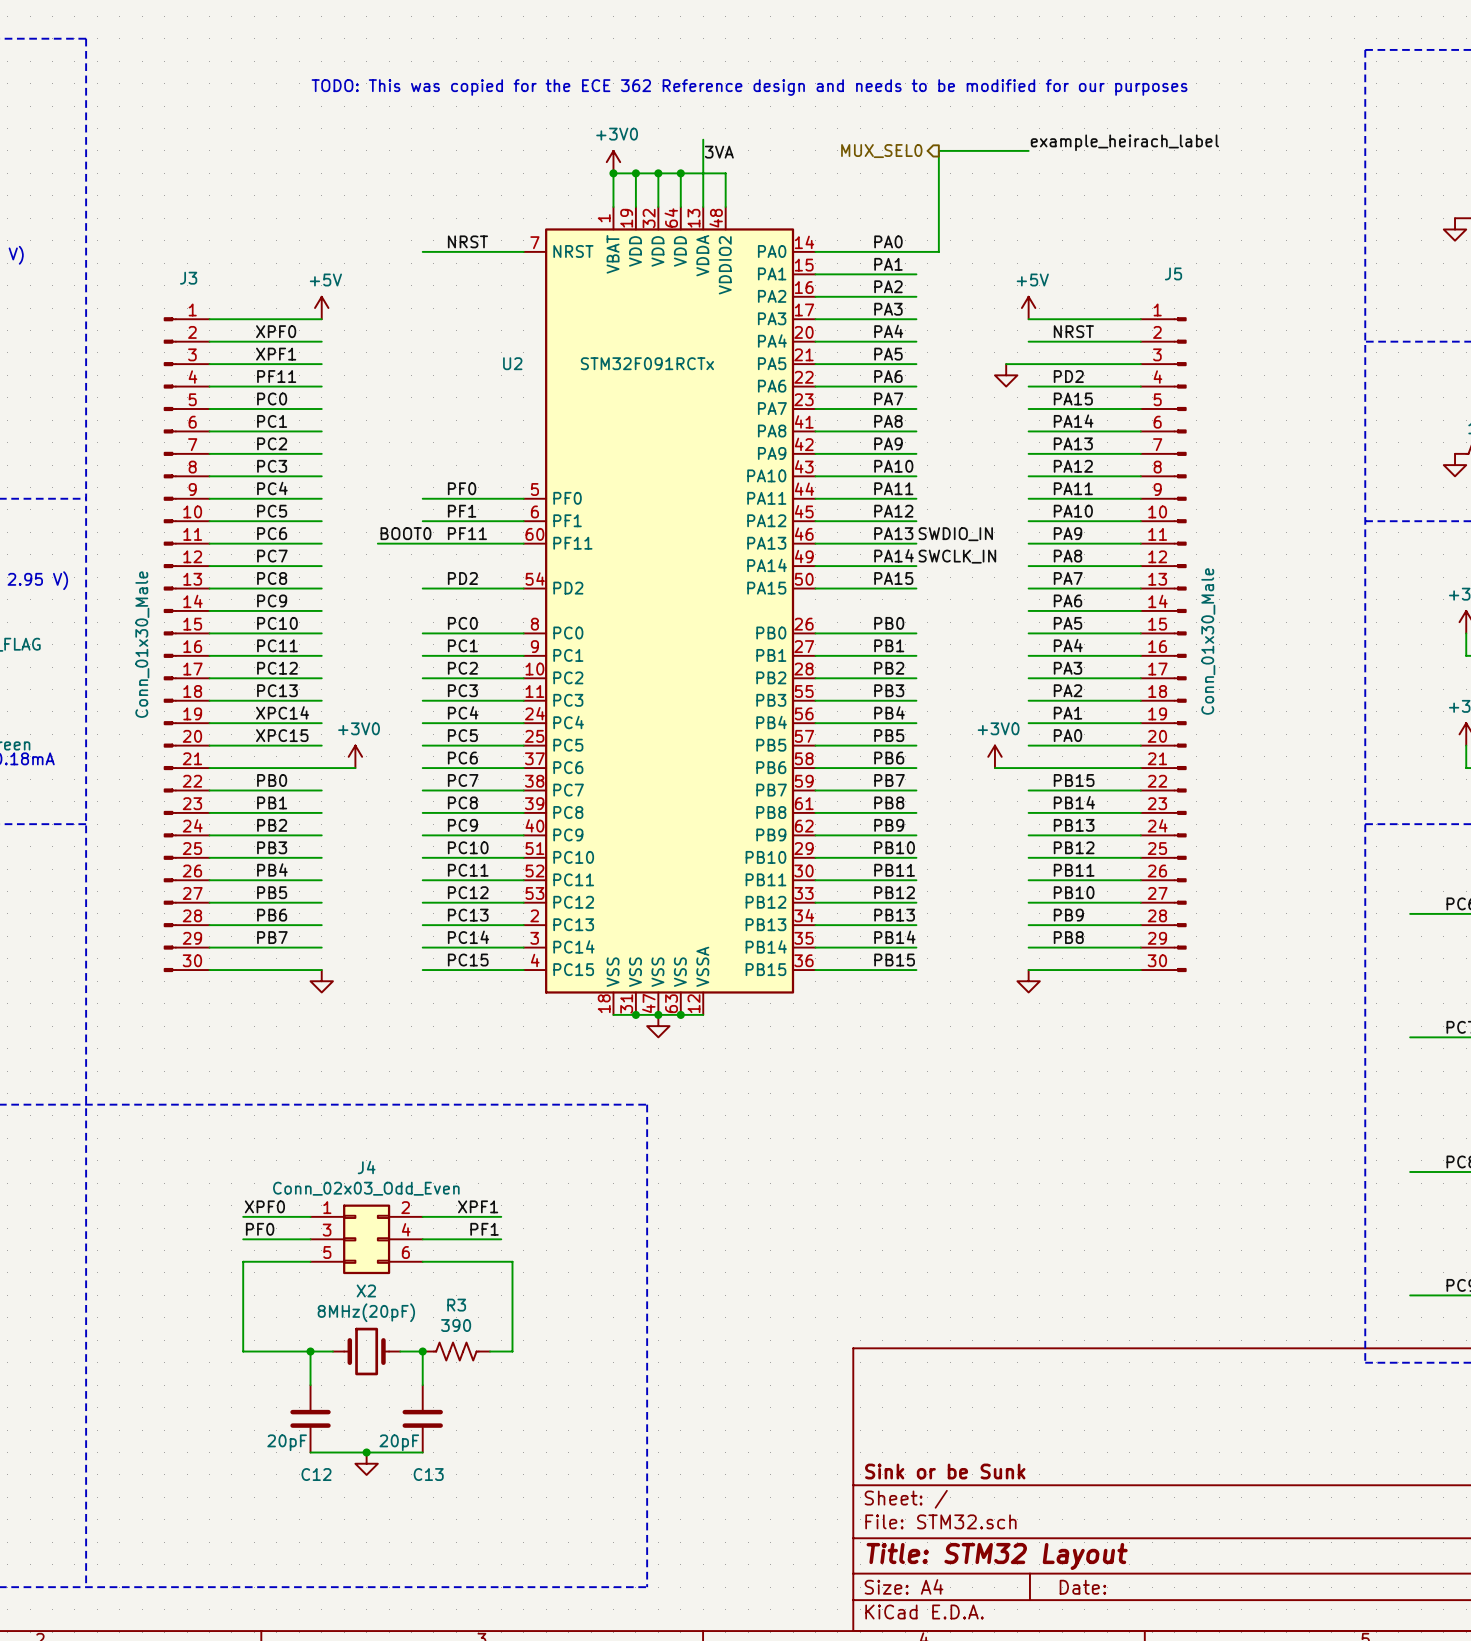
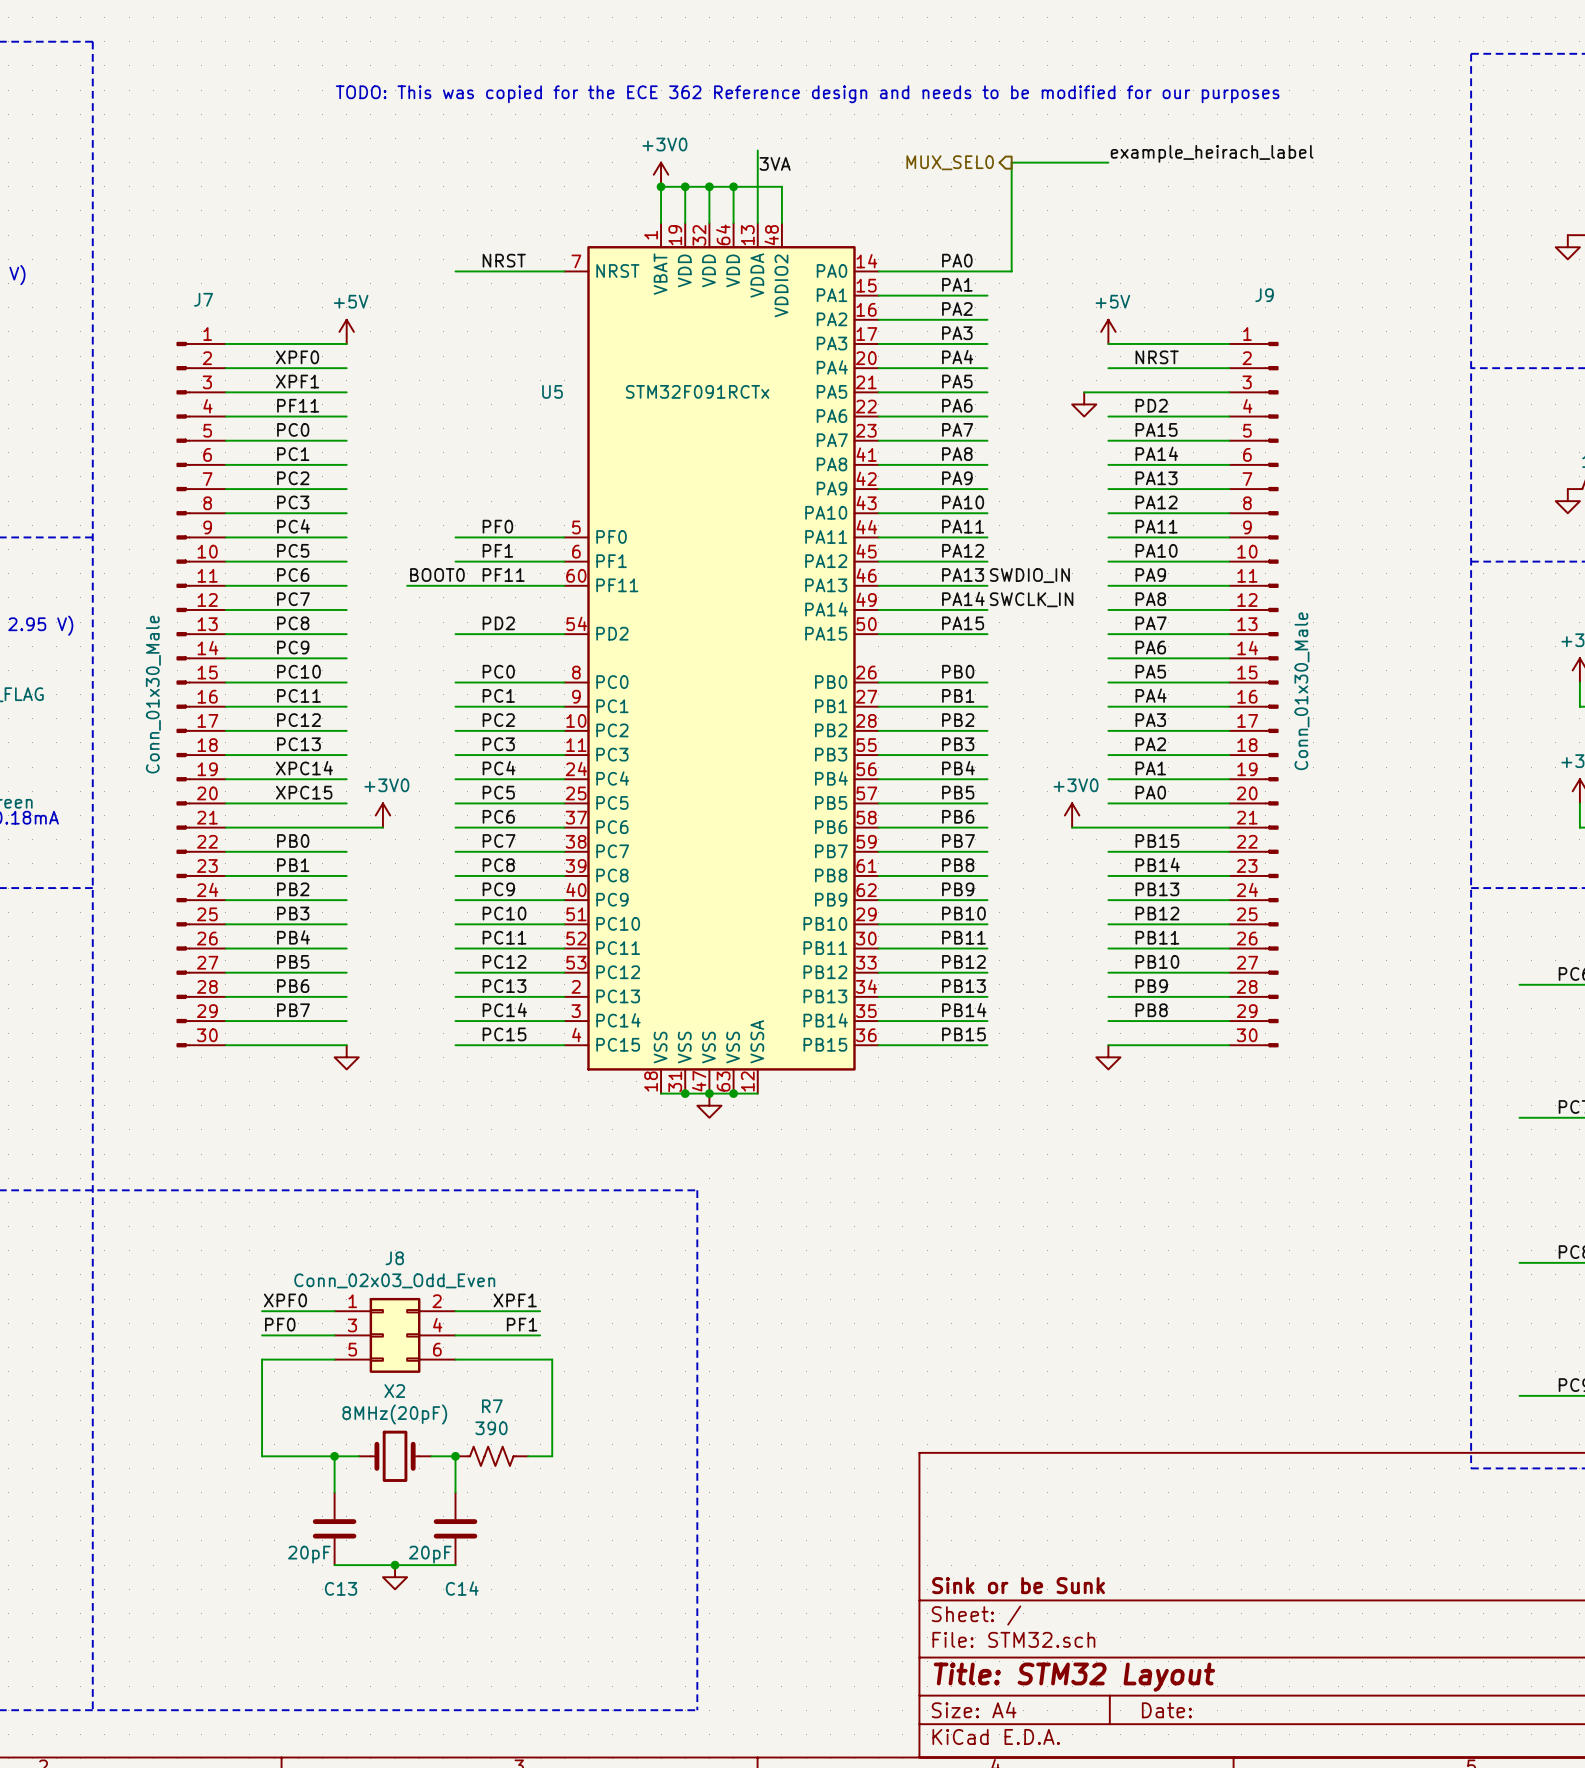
J5 name: J5 (1173, 273) -> J9 (1264, 295)
J3 name: J3 (188, 278) -> J7 (203, 299)
U2 name: U2 (512, 363) -> U5 (552, 391)
J4 name: J4 (366, 1167) -> J8 (394, 1258)
R3 name: R3 (456, 1305) -> R7 (492, 1406)
C12 name: C12 (316, 1474) -> C13 (341, 1588)
C13 name: C13 (428, 1474) -> C14 (462, 1588)

